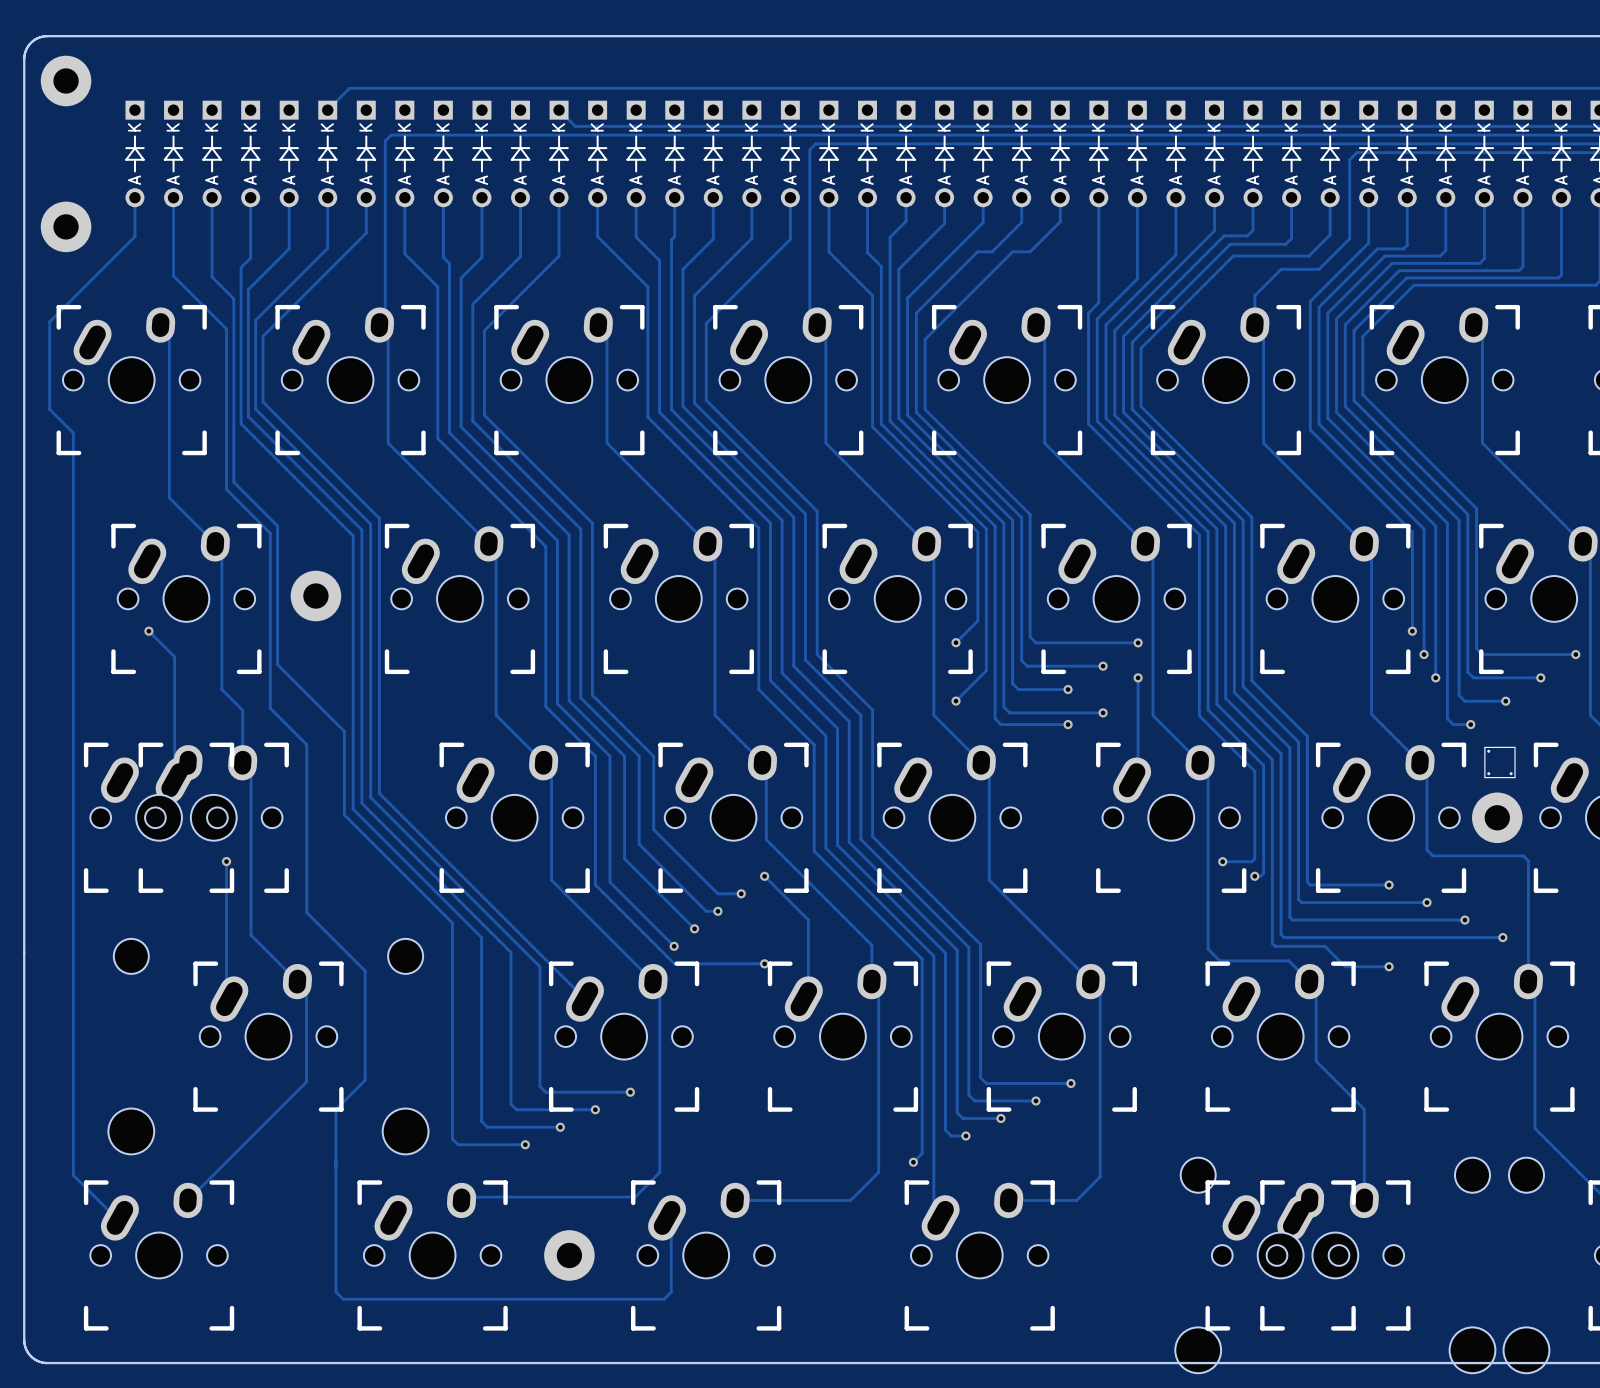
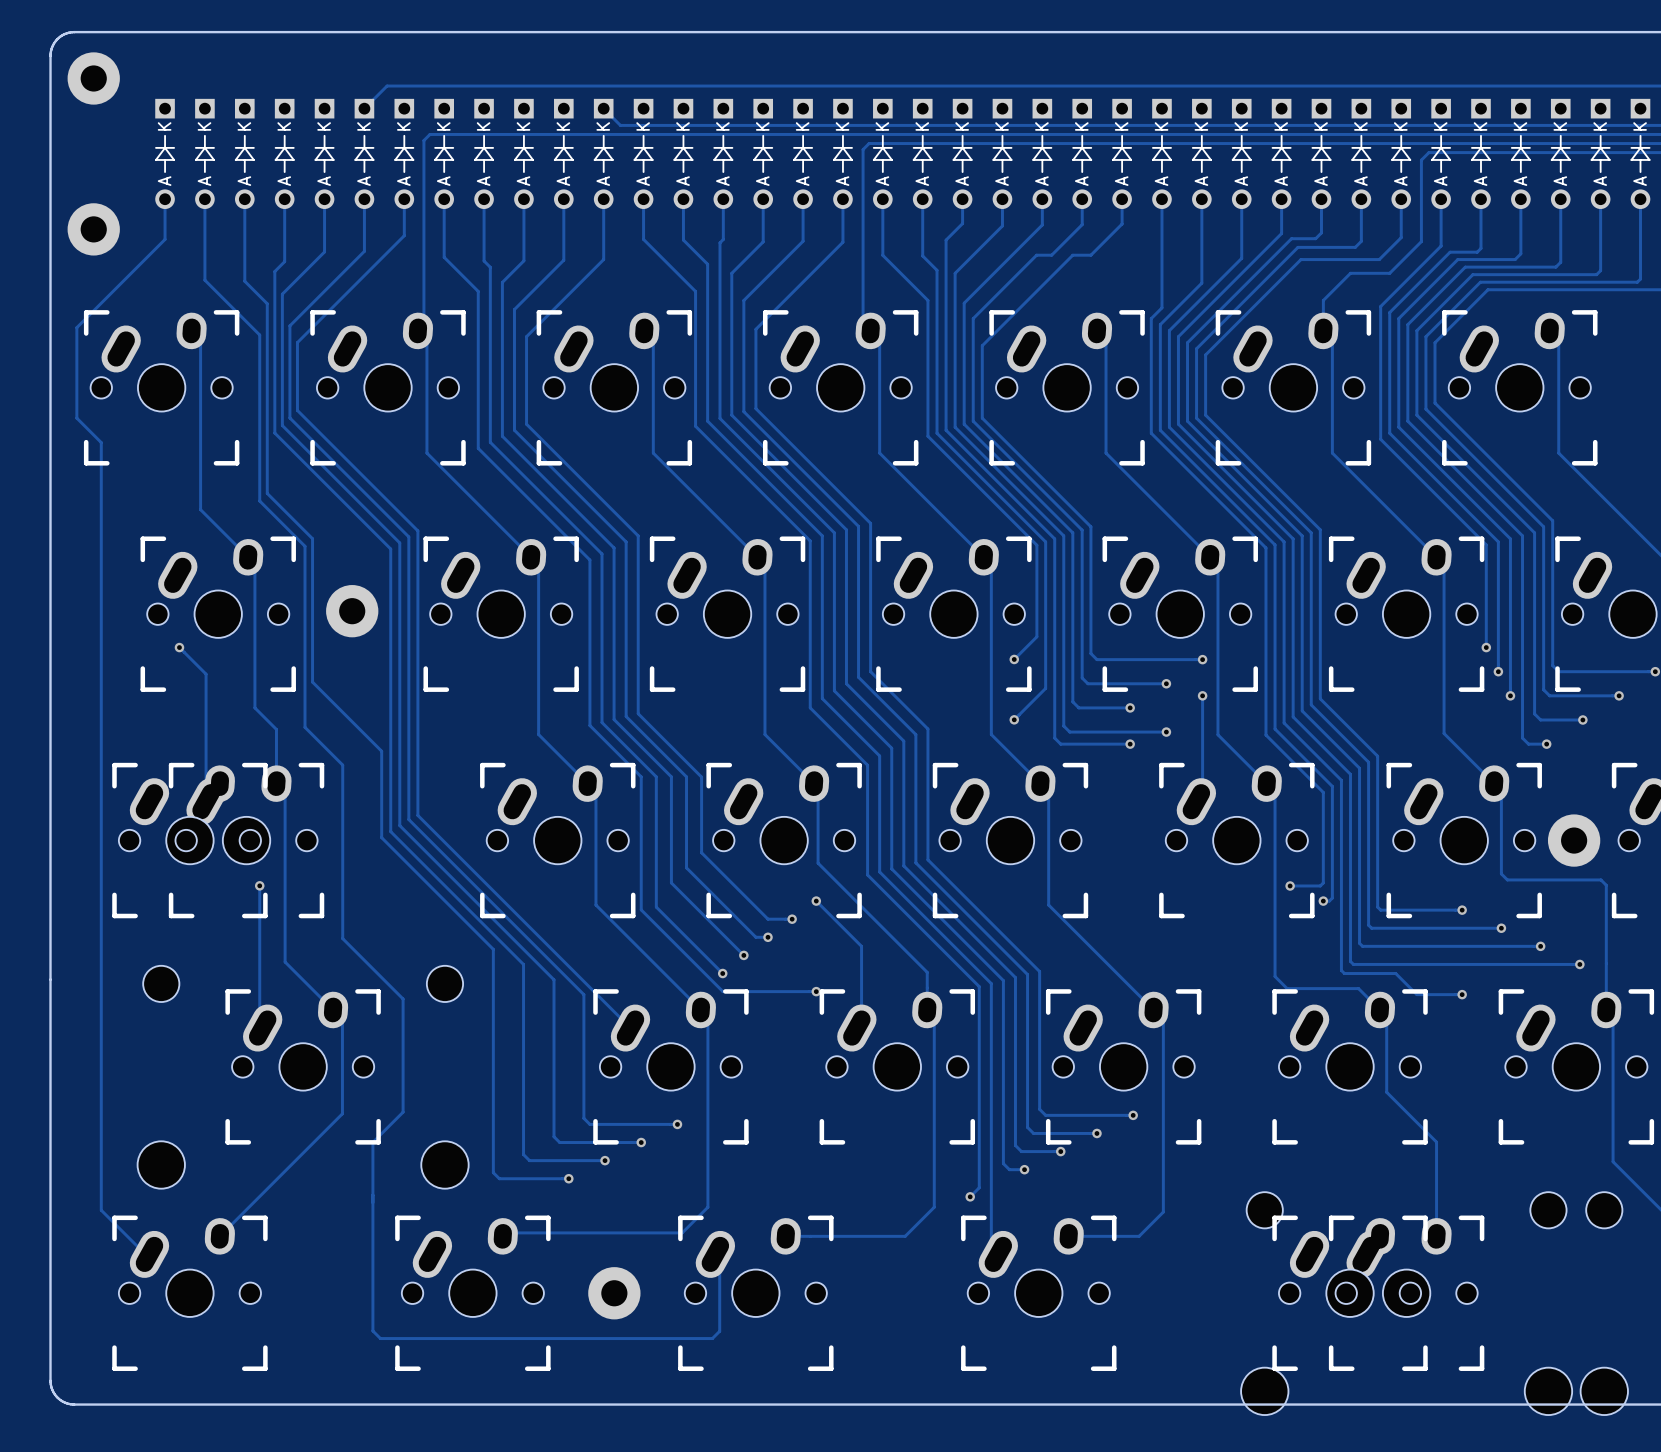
drawing: [1484, 746, 1516, 779] -> none

